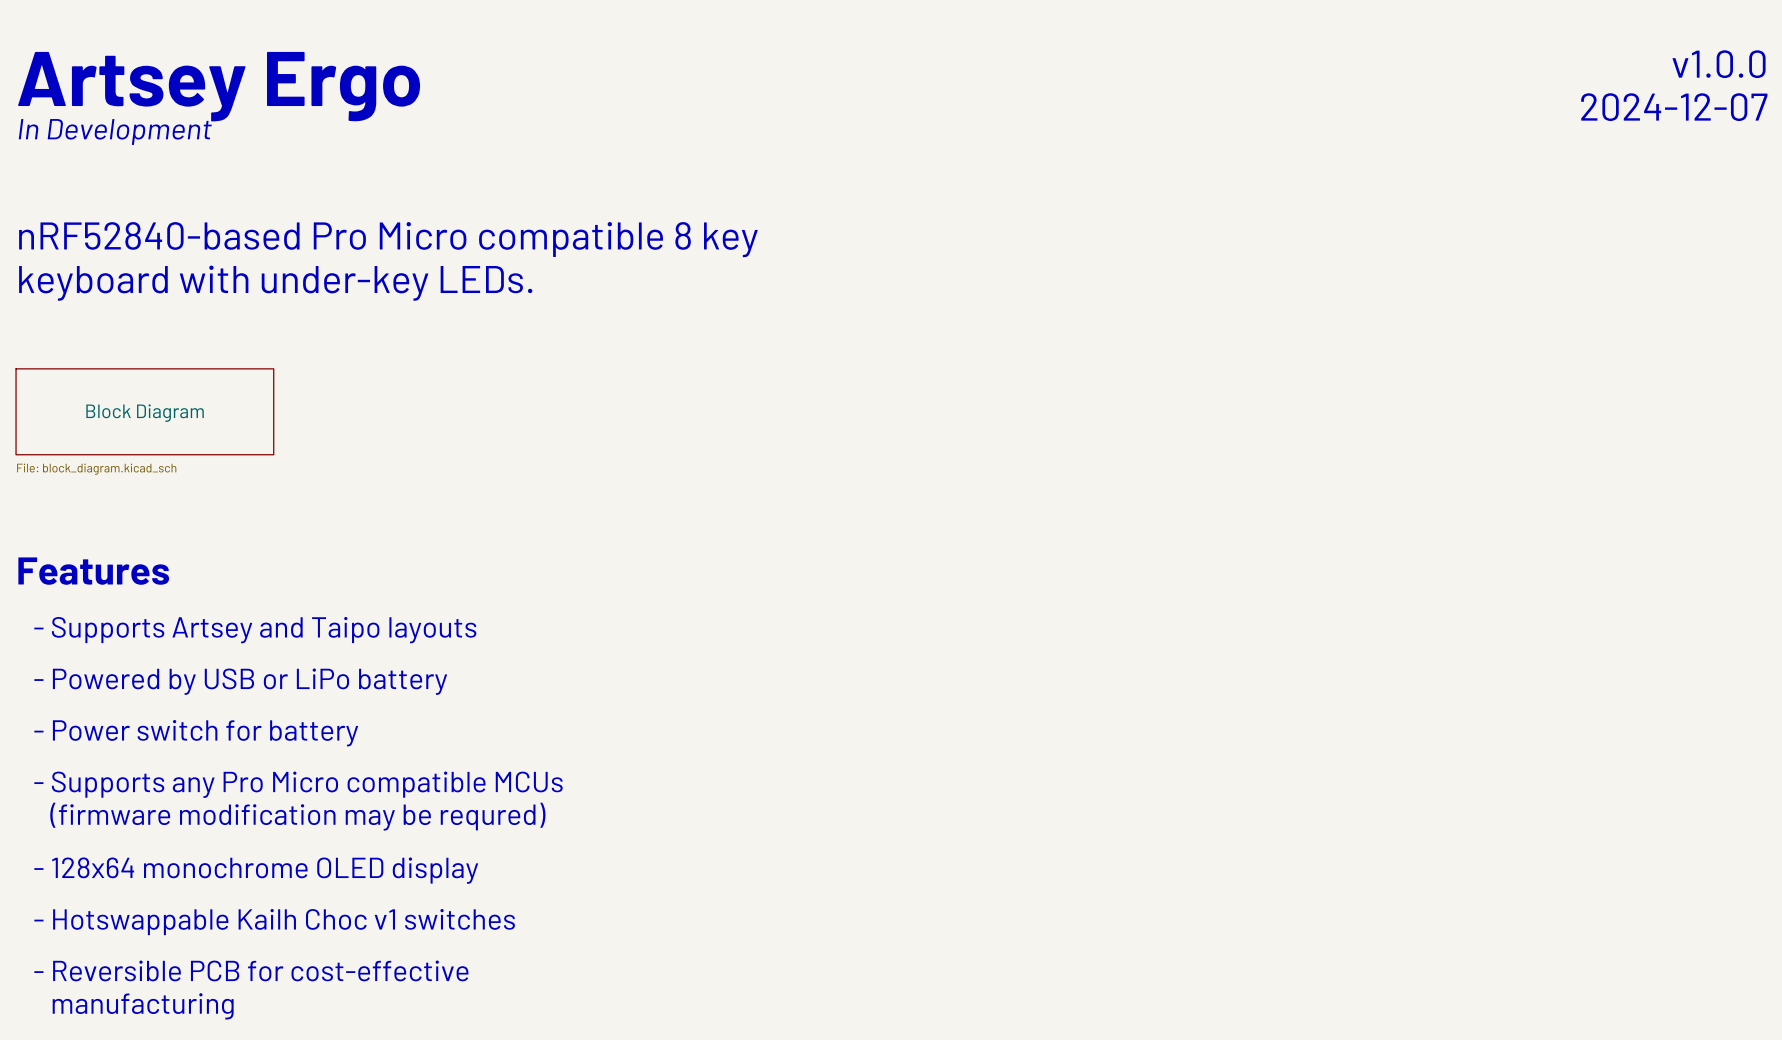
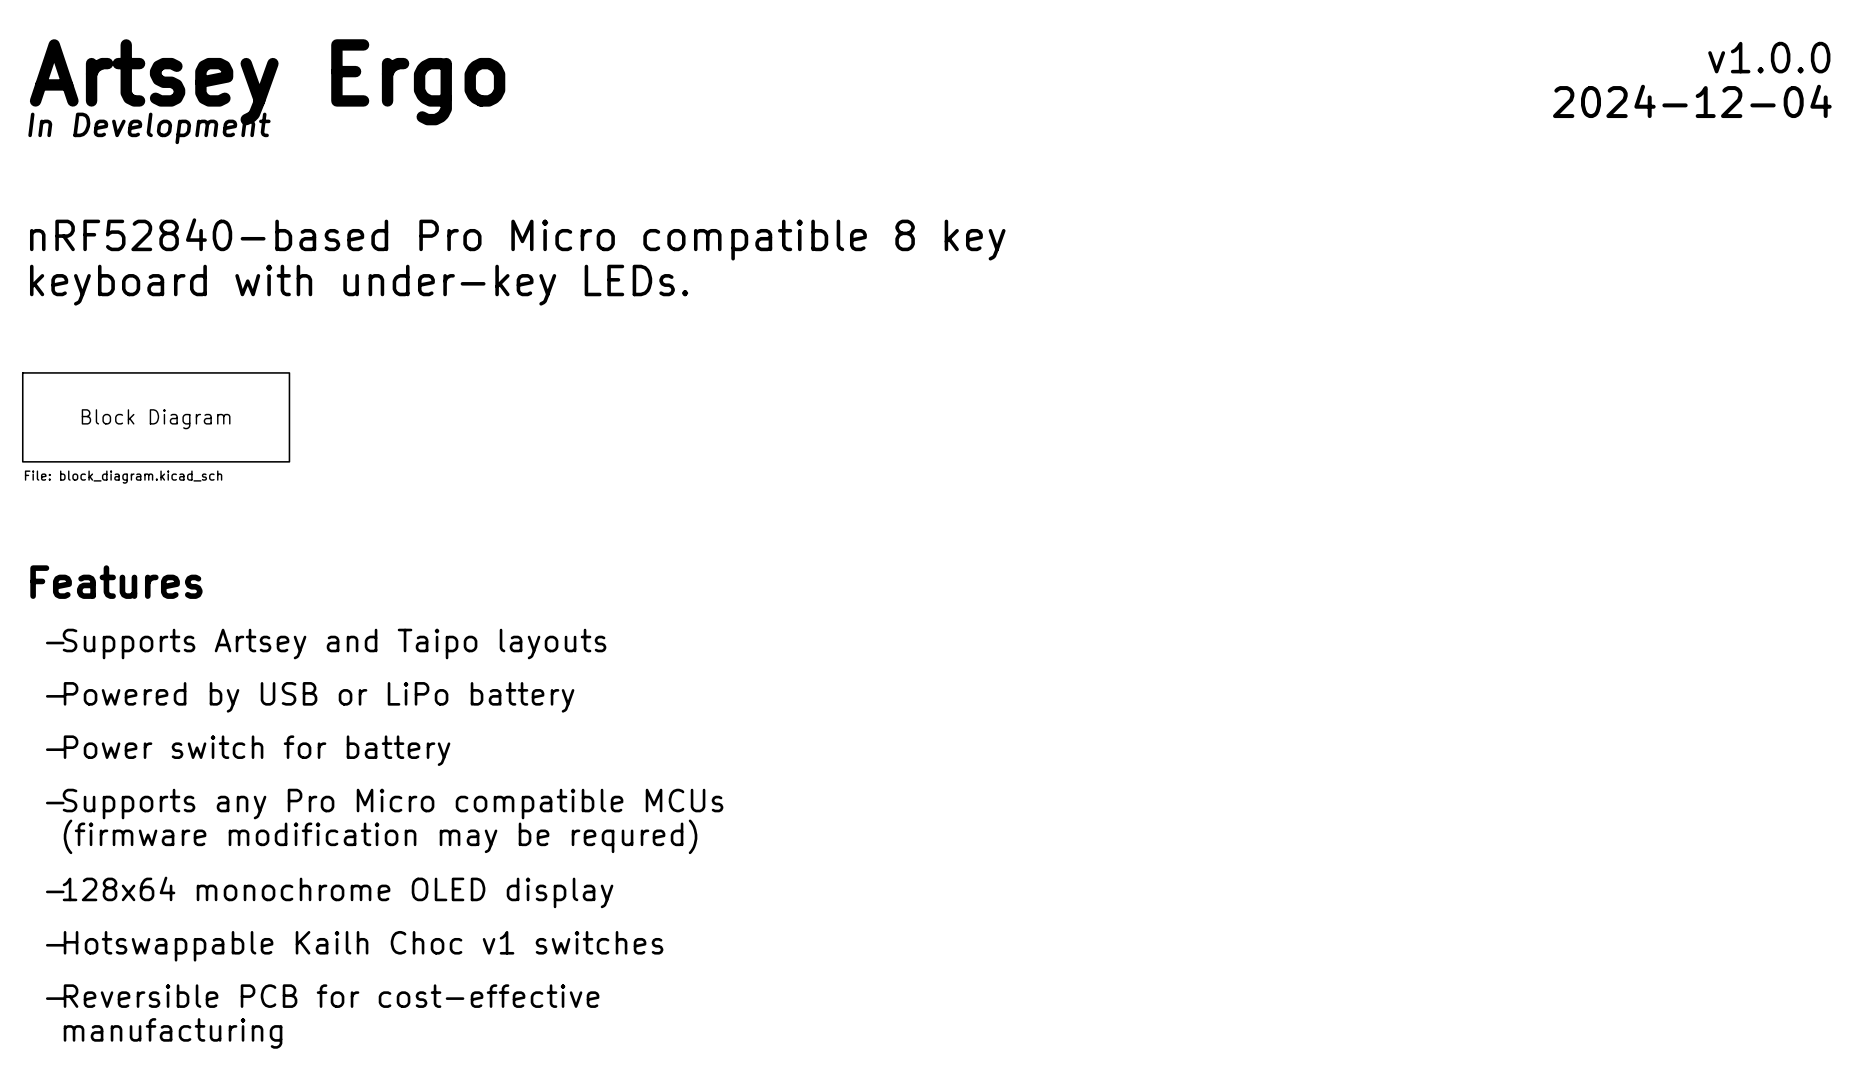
text: 2024-12-07 (1674, 107) -> 2024-12-04 (1692, 101)

